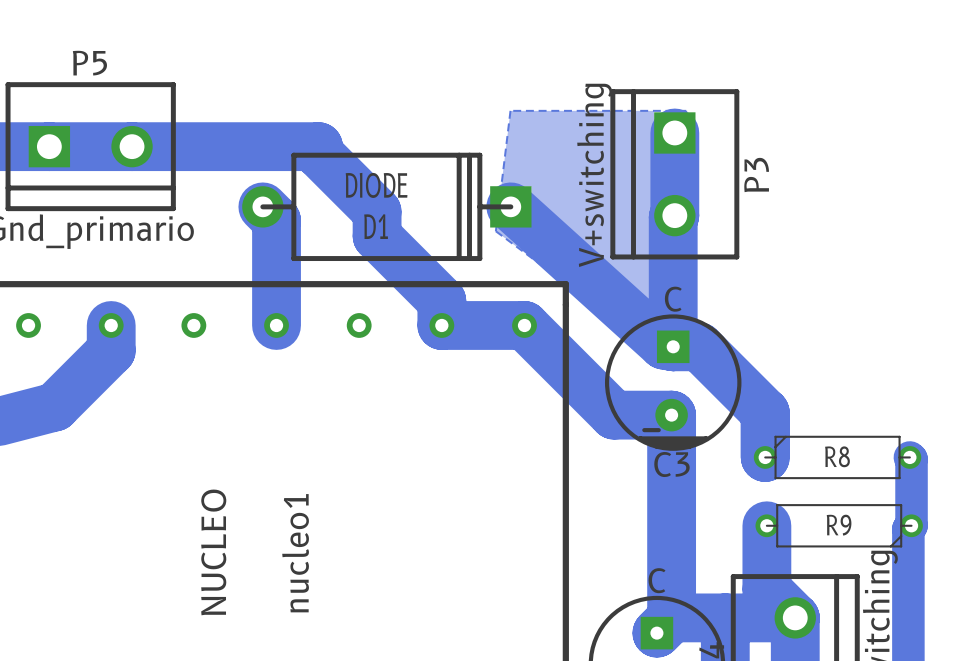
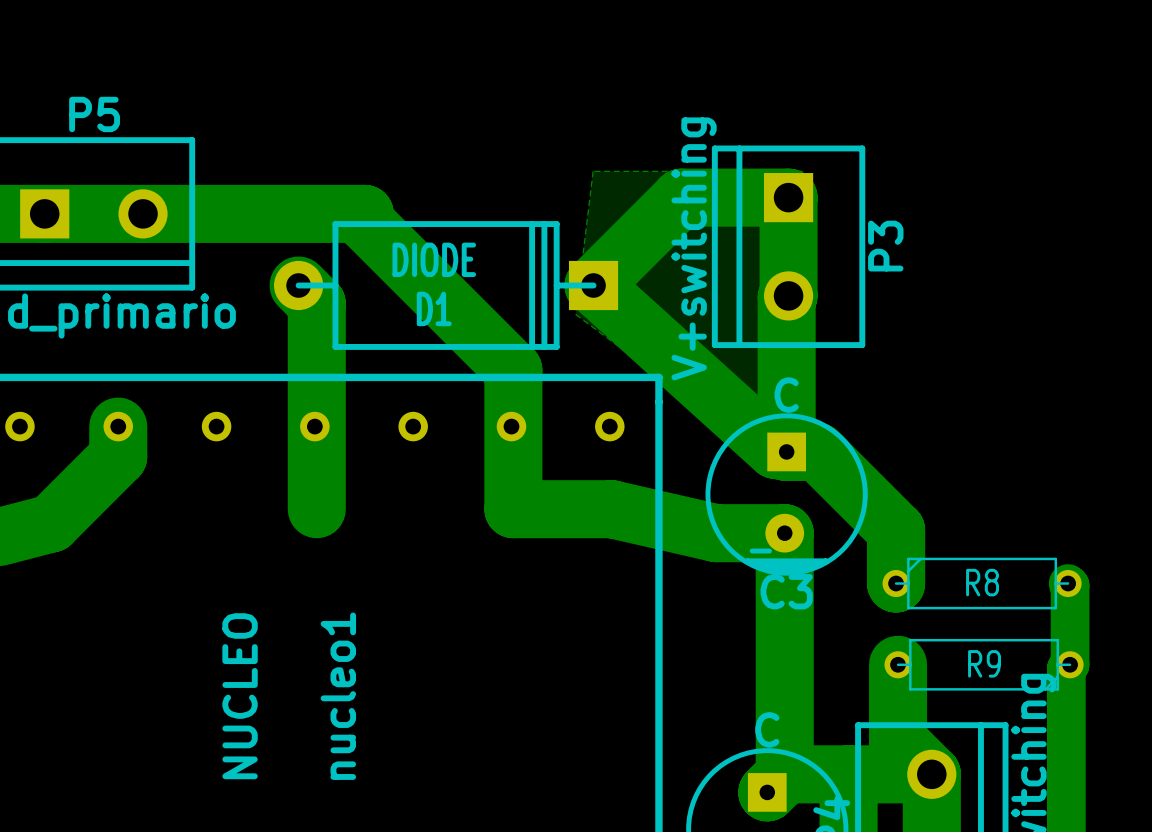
bottom track: none -> (788, 197) (681, 197) (593, 285)
bottom track: (377, 211) (377, 236) (441, 300) (441, 325) (524, 325) (614, 415) -> (434, 291) (513, 370) (513, 509) (611, 509) (716, 533)
bottom track: (276, 220) (276, 325) -> (314, 301) (316, 303) (316, 509)

